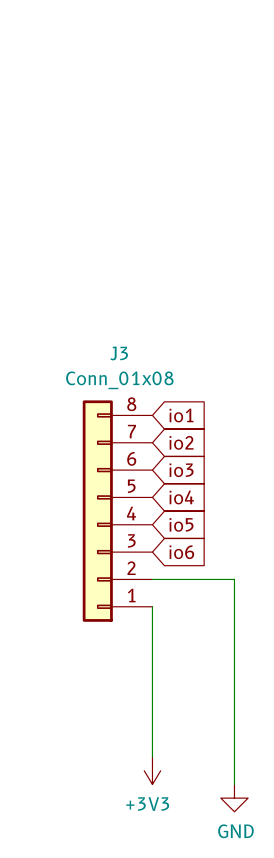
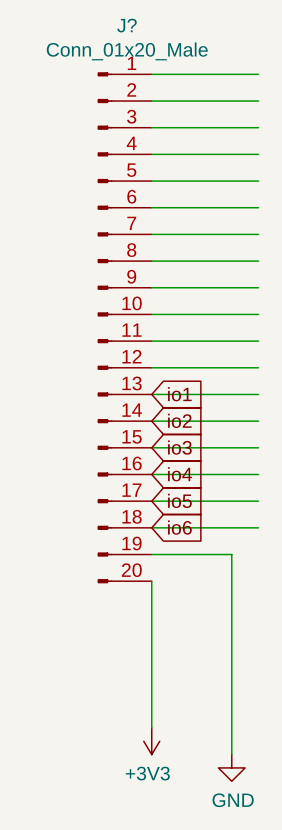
wire: none -> (151, 74) (258, 74)
wire: none -> (151, 101) (258, 101)
wire: none -> (151, 127) (258, 127)
wire: none -> (151, 154) (258, 154)
wire: none -> (151, 181) (258, 181)
wire: none -> (151, 207) (258, 207)
wire: none -> (151, 234) (258, 234)
wire: none -> (151, 261) (258, 261)
wire: none -> (151, 287) (258, 287)
wire: none -> (151, 314) (258, 314)
J?: none -> Conn_01x20_Male (124, 327)
wire: none -> (151, 341) (258, 341)
wire: none -> (151, 367) (258, 367)
wire: none -> (151, 394) (258, 394)
wire: none -> (151, 421) (258, 421)
wire: none -> (151, 447) (258, 447)
wire: none -> (151, 474) (258, 474)
J3: Conn_01x08 (117, 511) -> none
wire: none -> (151, 501) (258, 501)
wire: none -> (151, 527) (258, 527)

